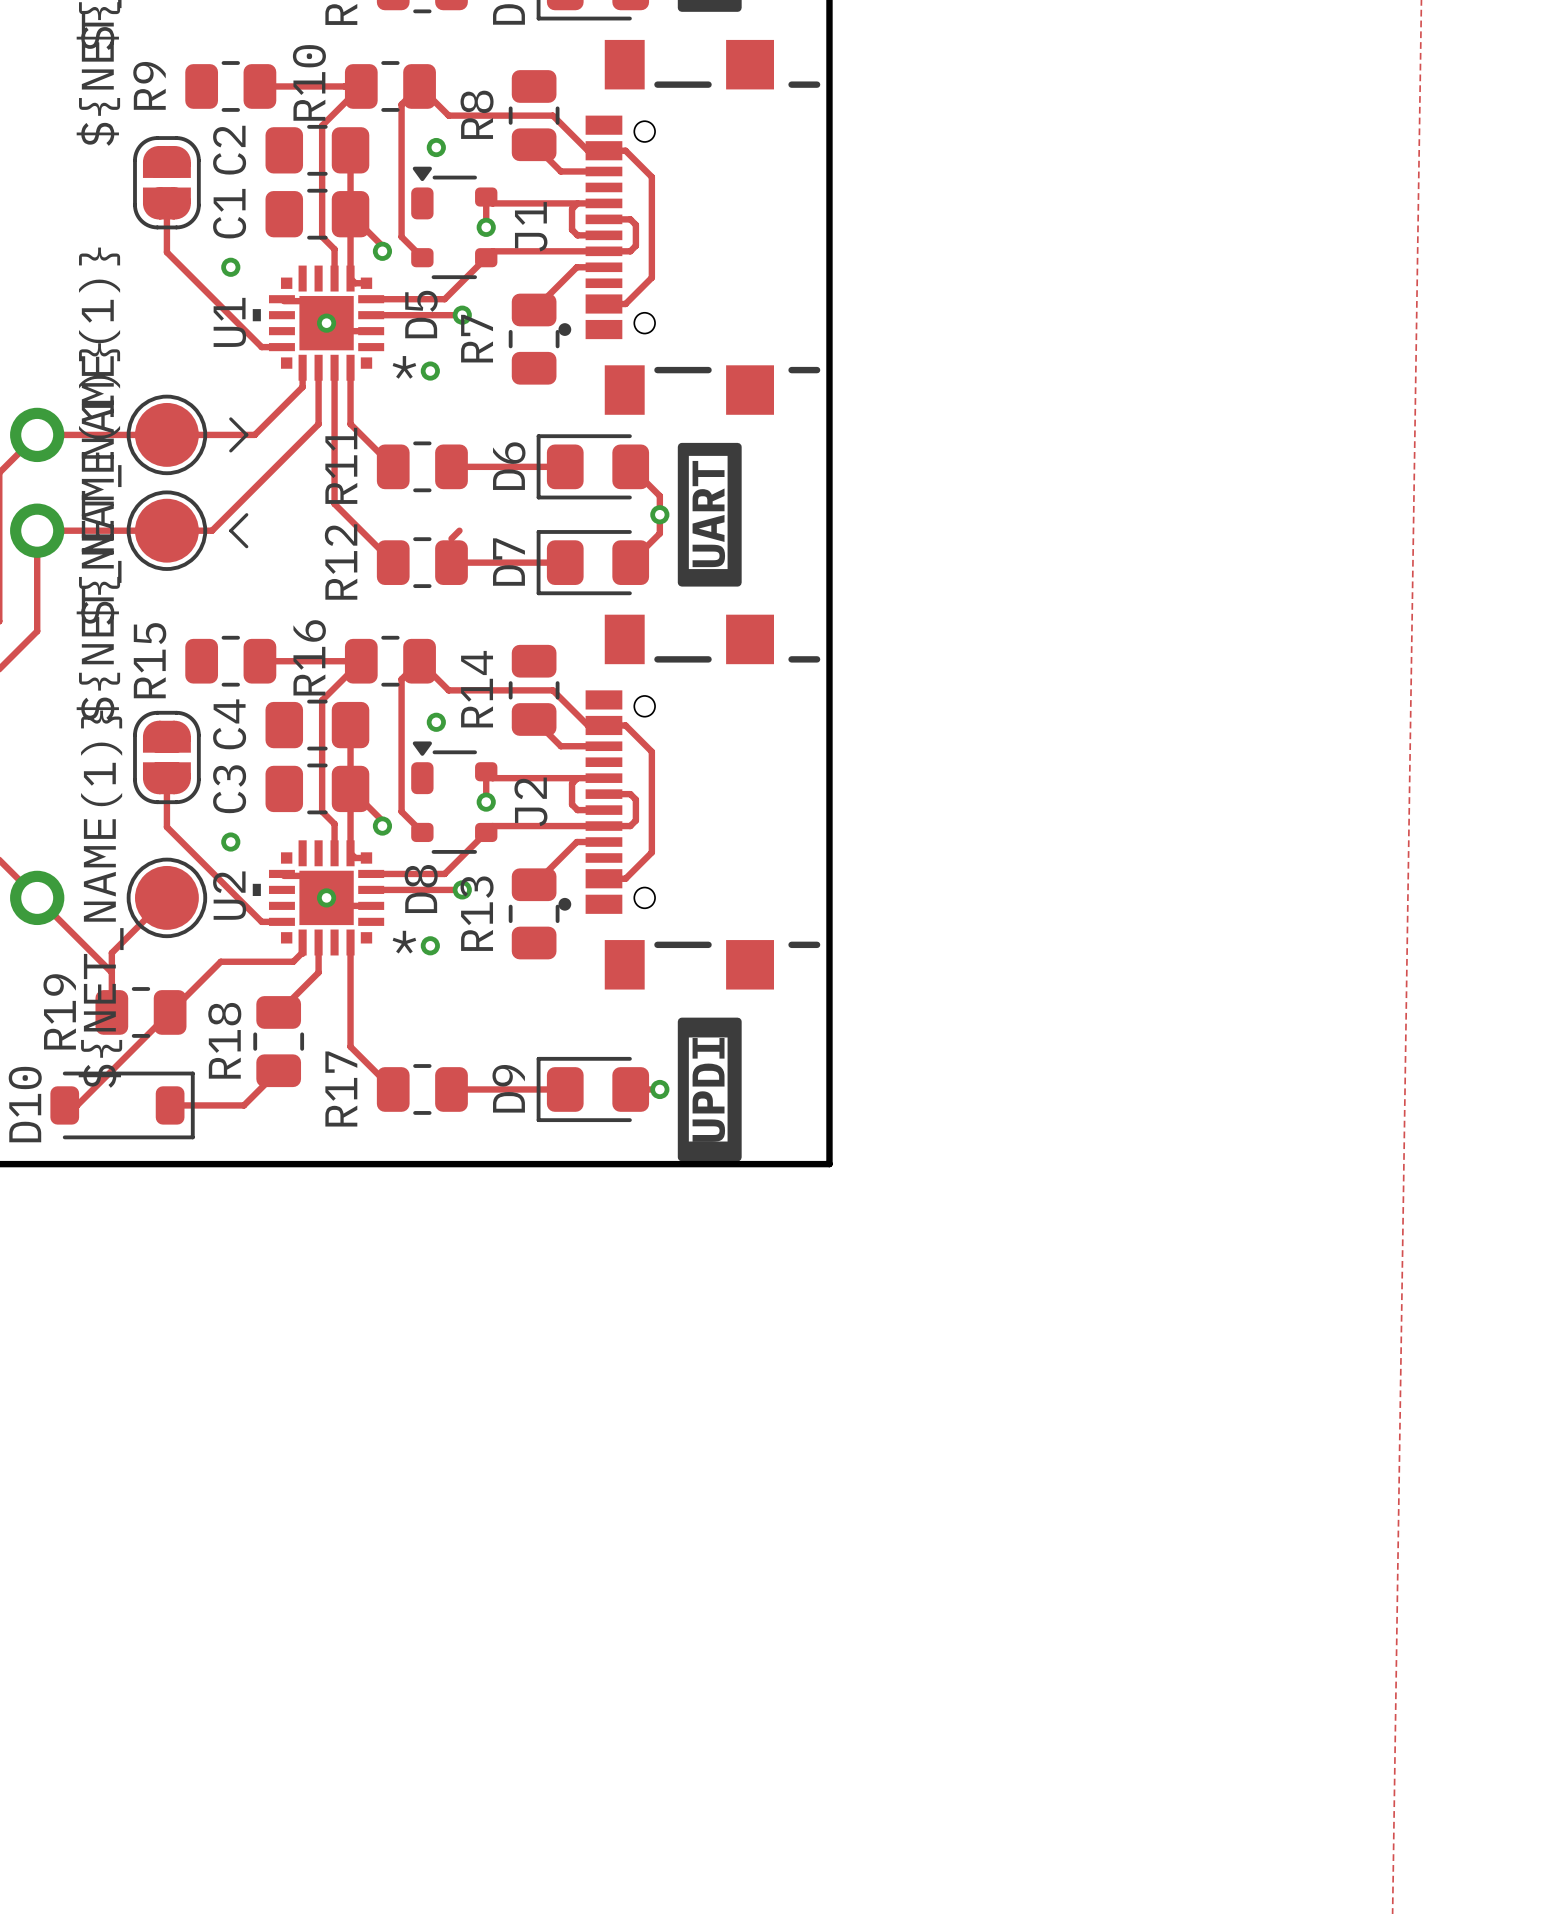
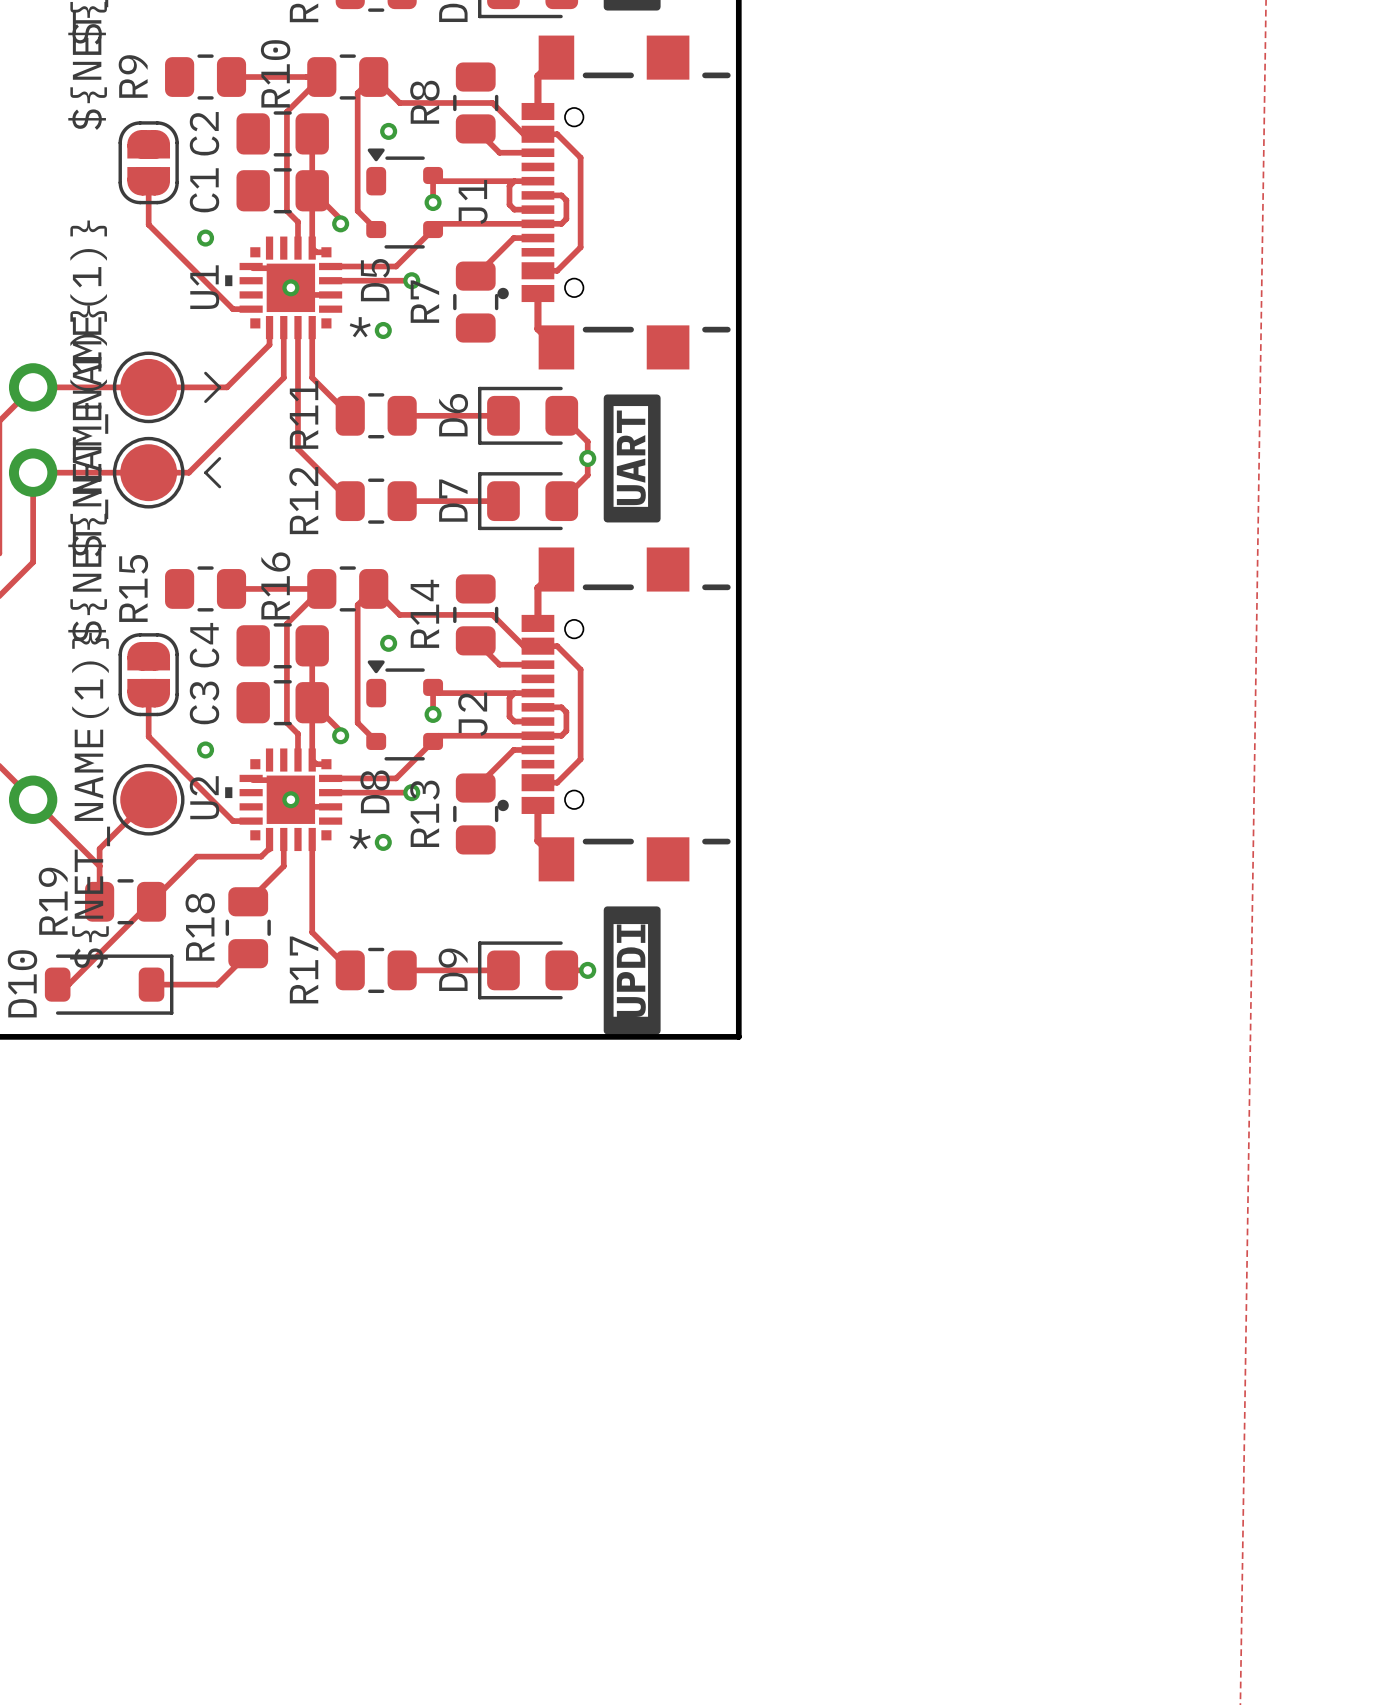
track: none -> (556, 57) (537, 76) (537, 111)
track: none -> (537, 293) (537, 328) (556, 347)
track: (459, 530) (451, 538) -> none
track: none -> (556, 569) (537, 588) (537, 623)
track: none -> (537, 805) (537, 840) (556, 859)

